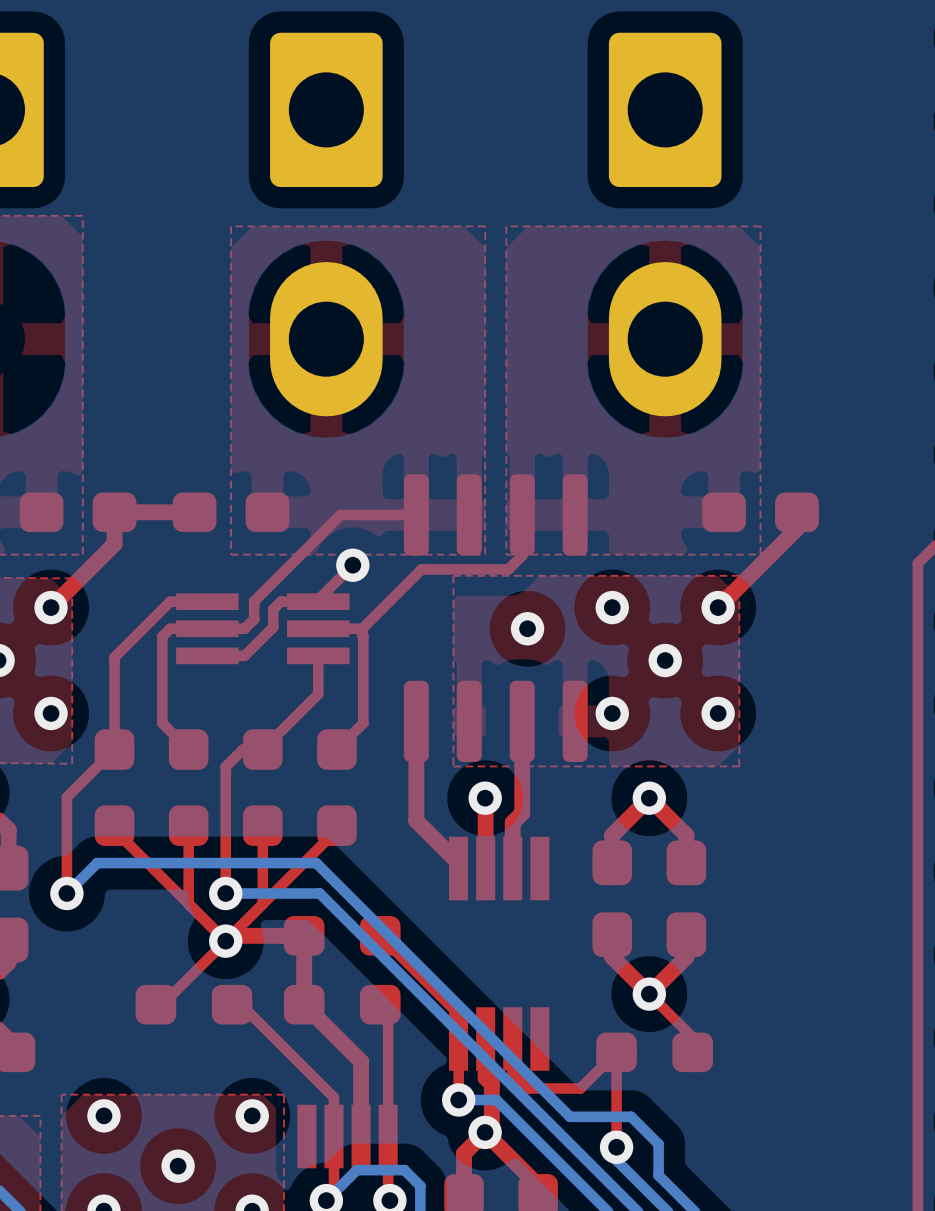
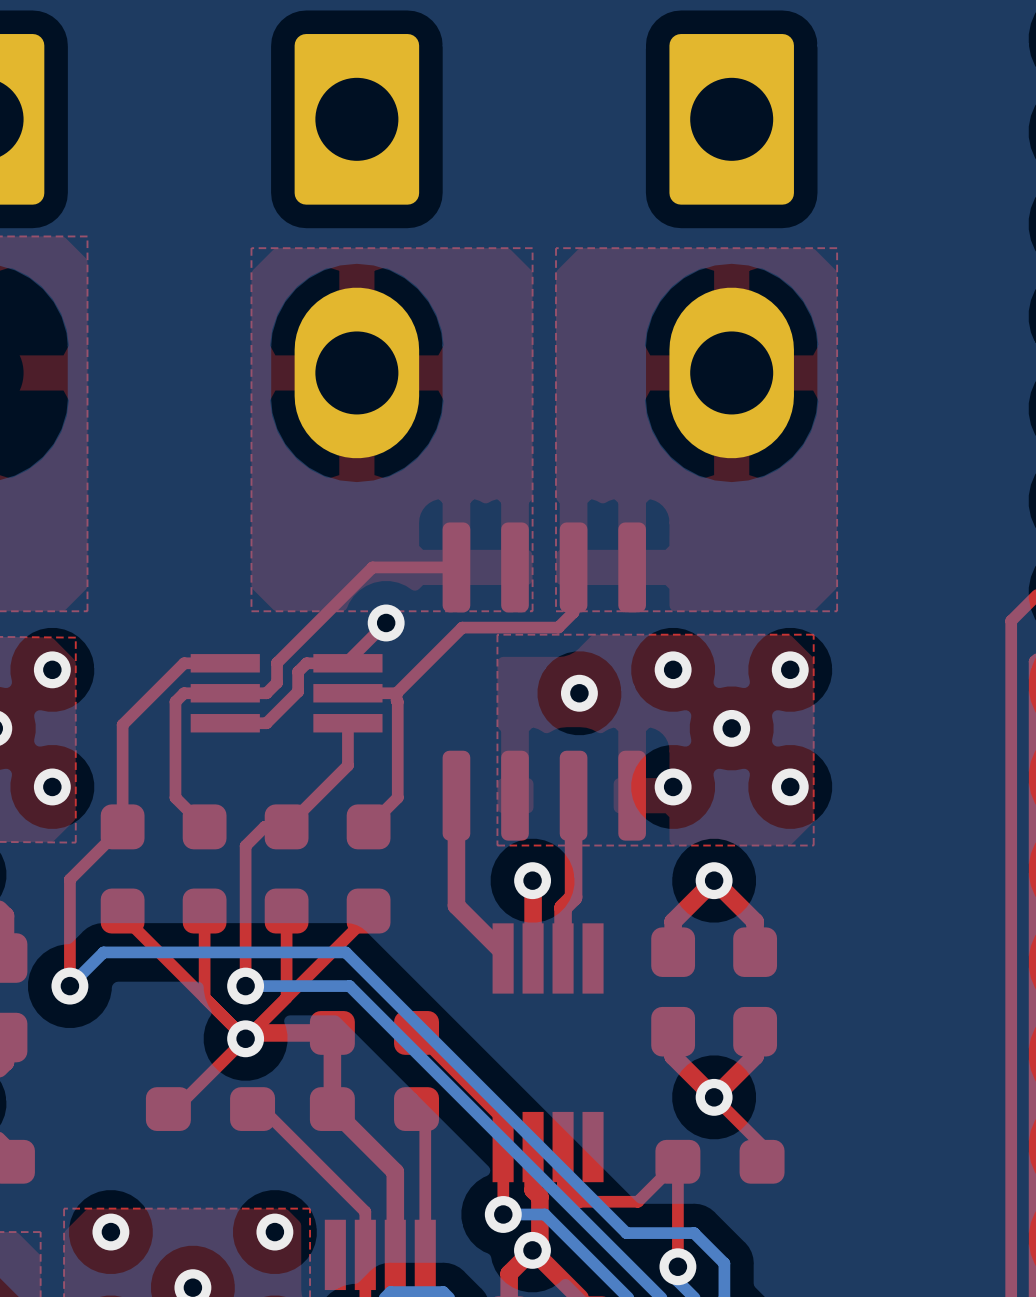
part: (78, 512) -> none
top track: (194, 512) (114, 512) (114, 544) (51, 607) -> none
part: (231, 512) -> none
part: (760, 512) -> none
top track: (796, 512) (796, 528) (718, 607) -> none

